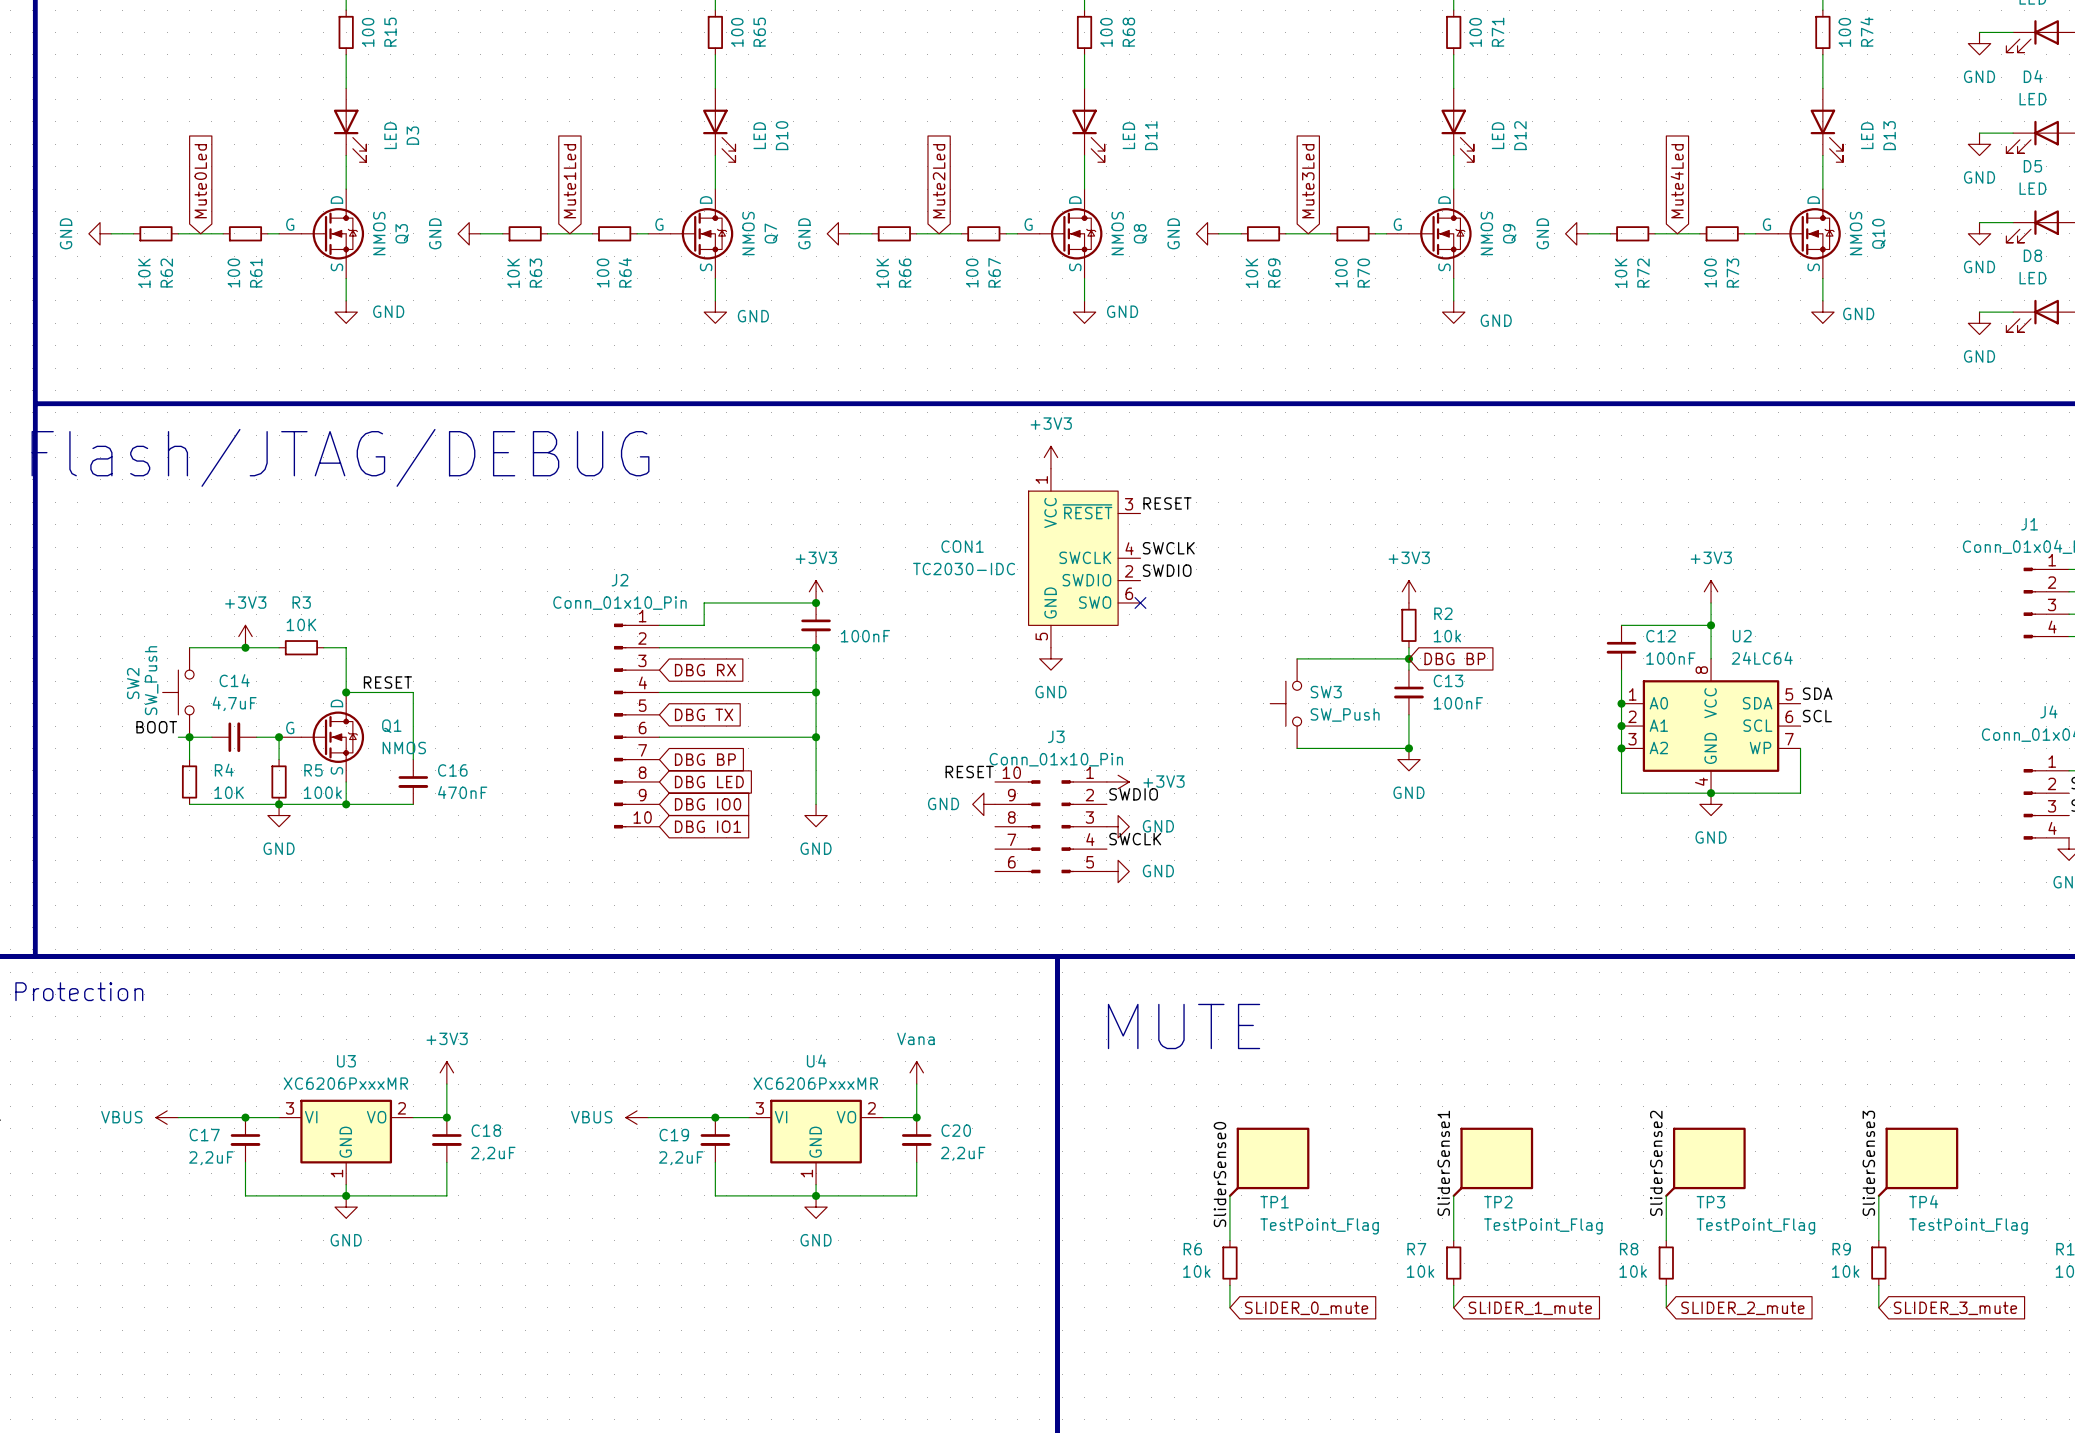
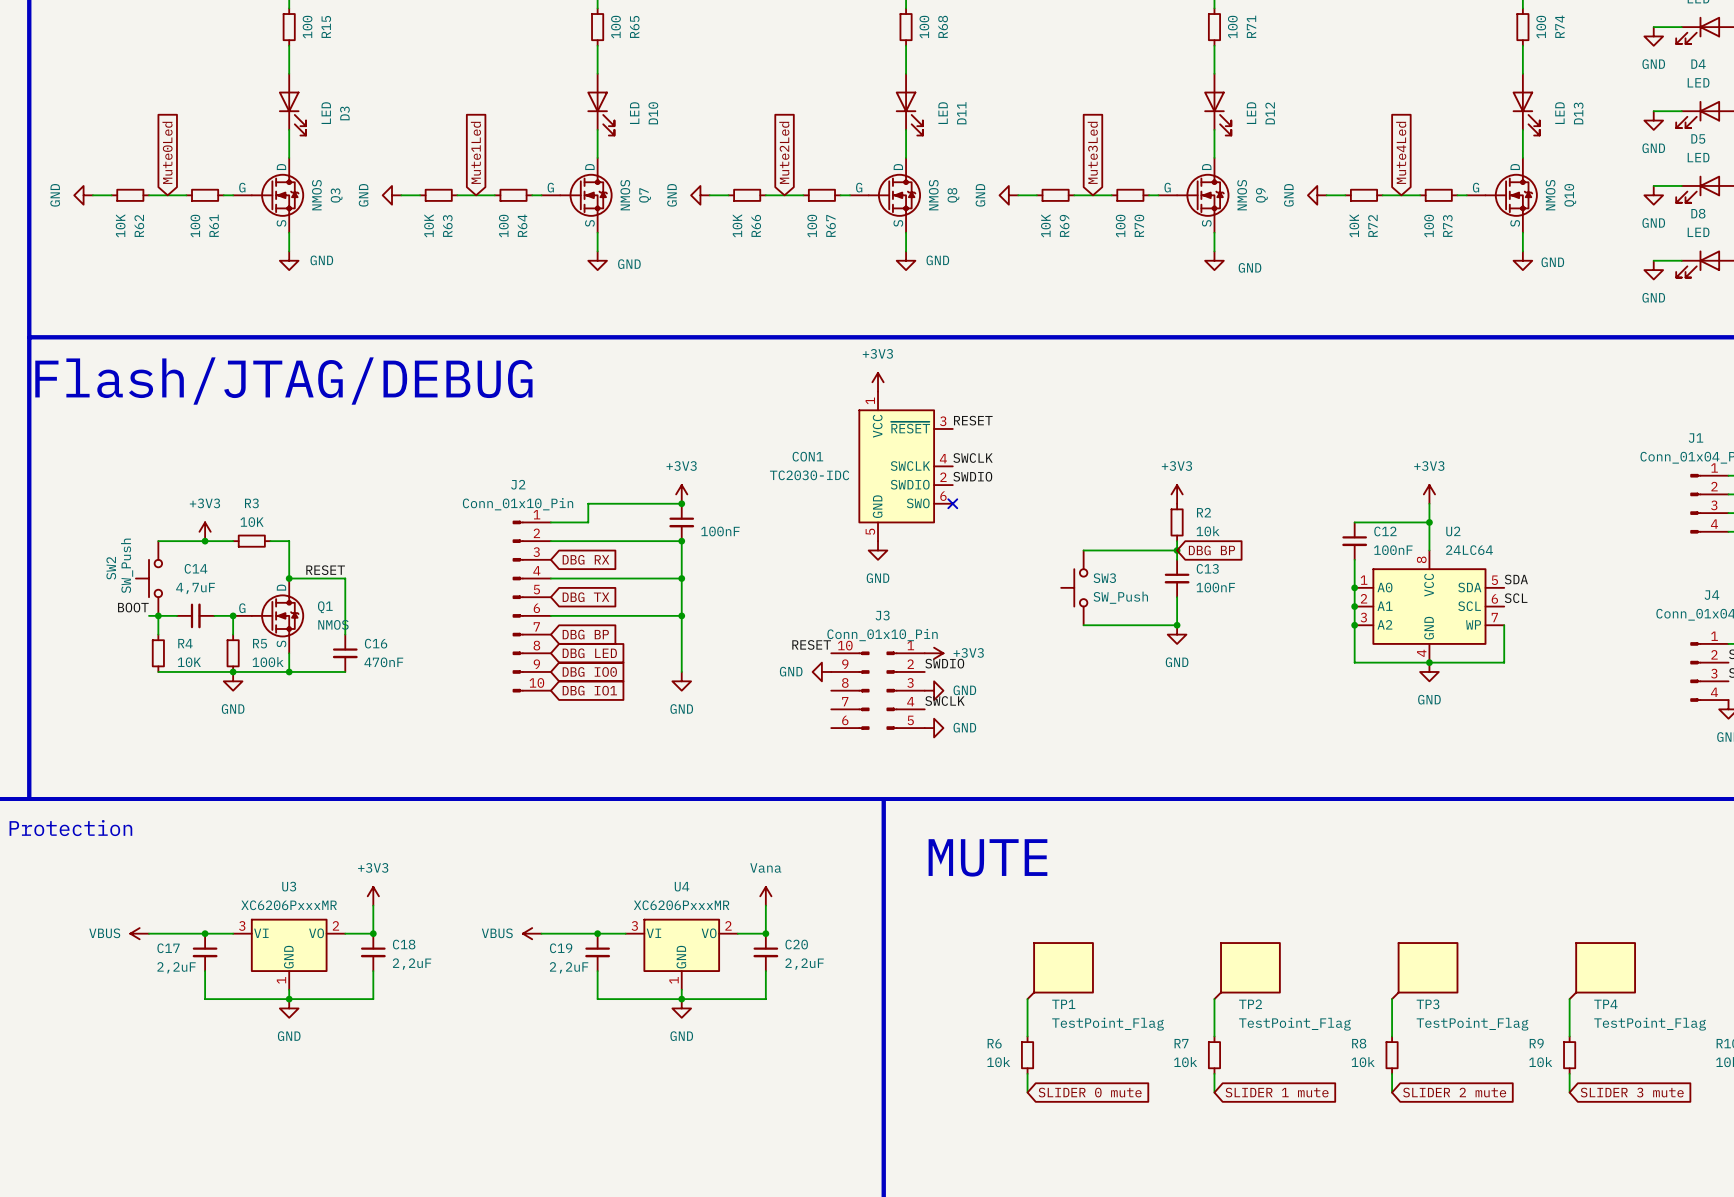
label: SliderSense1 (1443, 1163) -> none
label: SliderSense2 (1656, 1163) -> none
label: SliderSense3 (1868, 1163) -> none
label: SliderSense0 (1219, 1174) -> none
global label: SLIDER_0_mute (1306, 1308) -> SLIDER 0 mute (1090, 1092)
global label: SLIDER_1_mute (1530, 1308) -> SLIDER 1 mute (1277, 1092)
global label: SLIDER_2_mute (1742, 1308) -> SLIDER 2 mute (1454, 1092)
global label: SLIDER_3_mute (1955, 1308) -> SLIDER 3 mute (1632, 1092)

